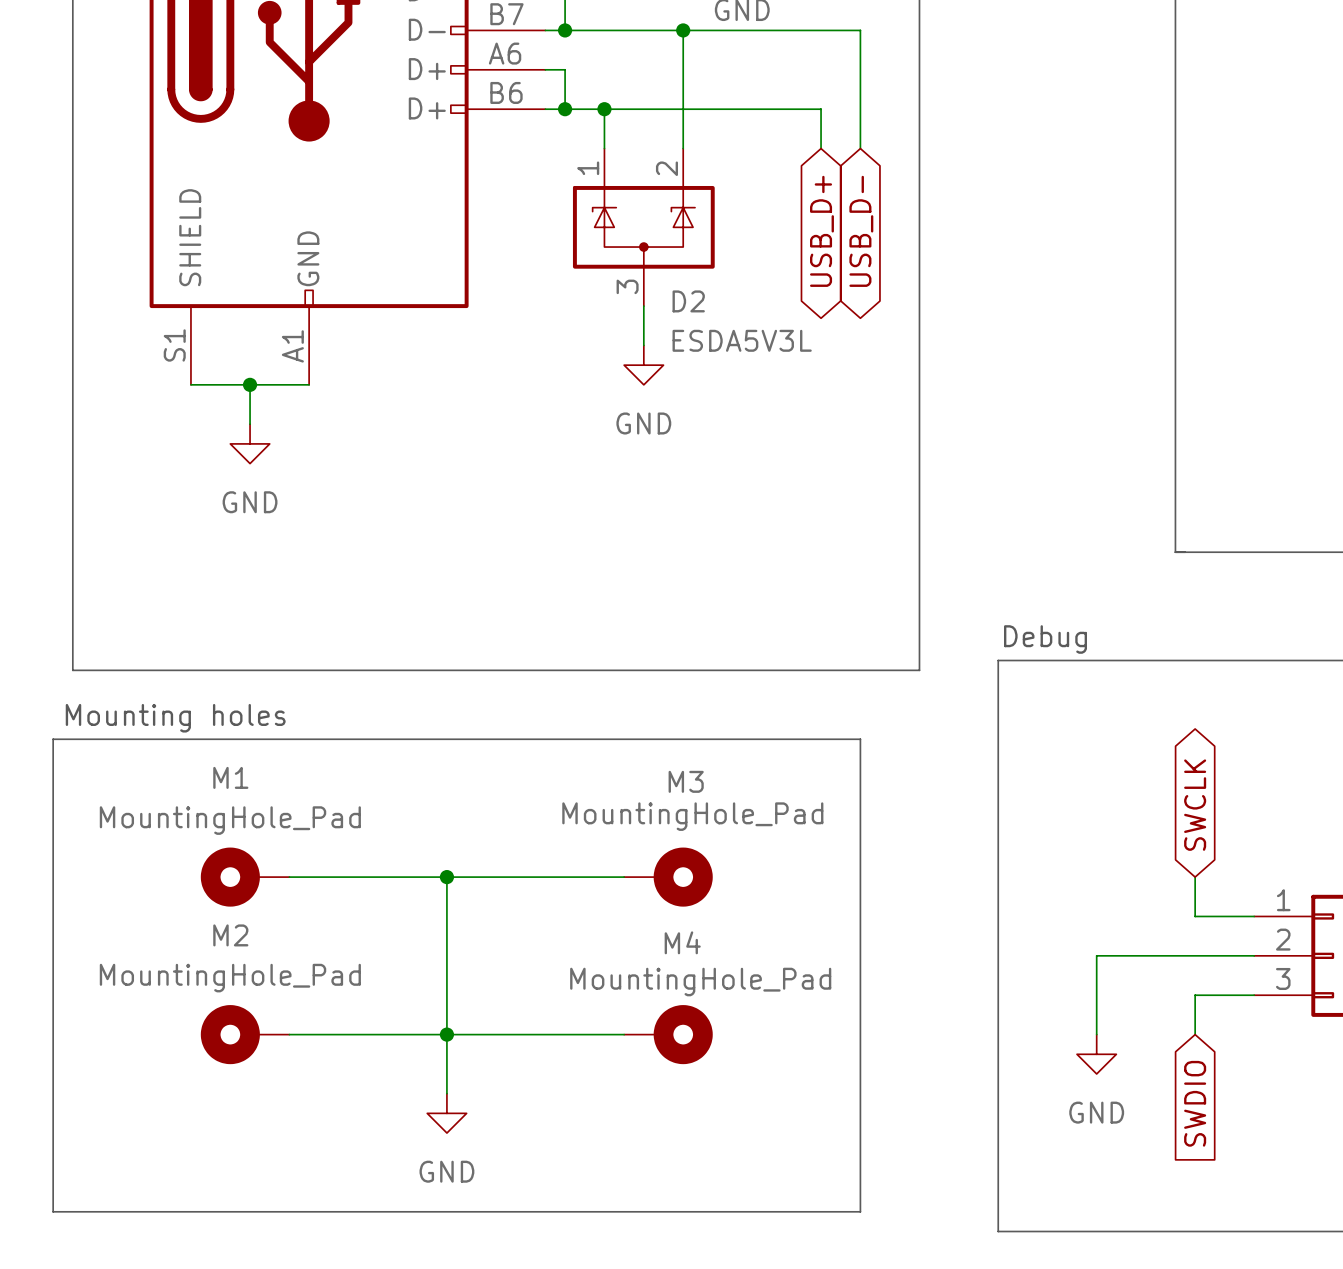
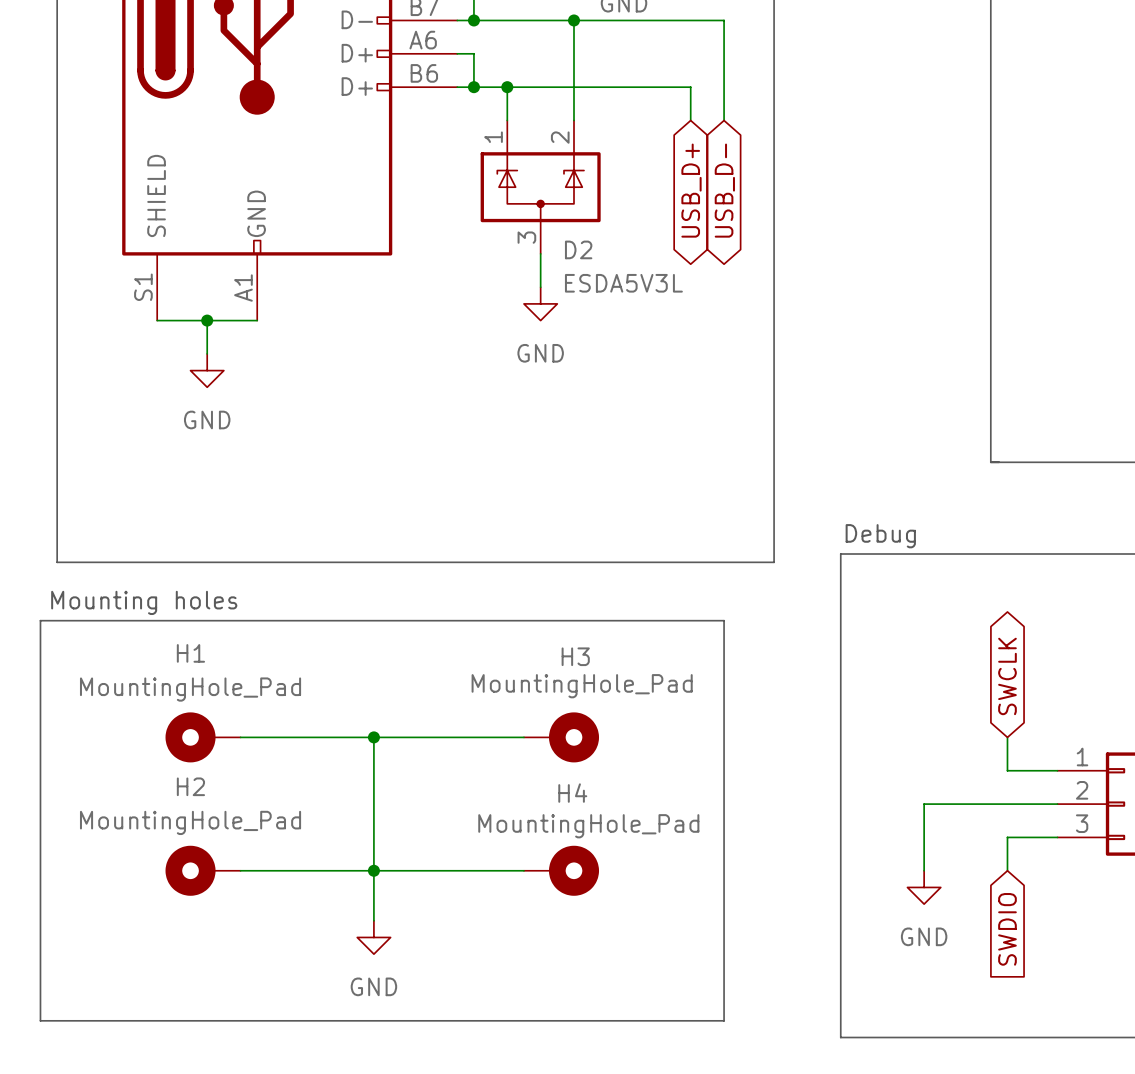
M1 name: M1 (230, 777) -> H1 (190, 653)
M3 name: M3 (686, 781) -> H3 (575, 656)
M2 name: M2 (230, 935) -> H2 (190, 786)
M4 name: M4 (682, 942) -> H4 (572, 793)

